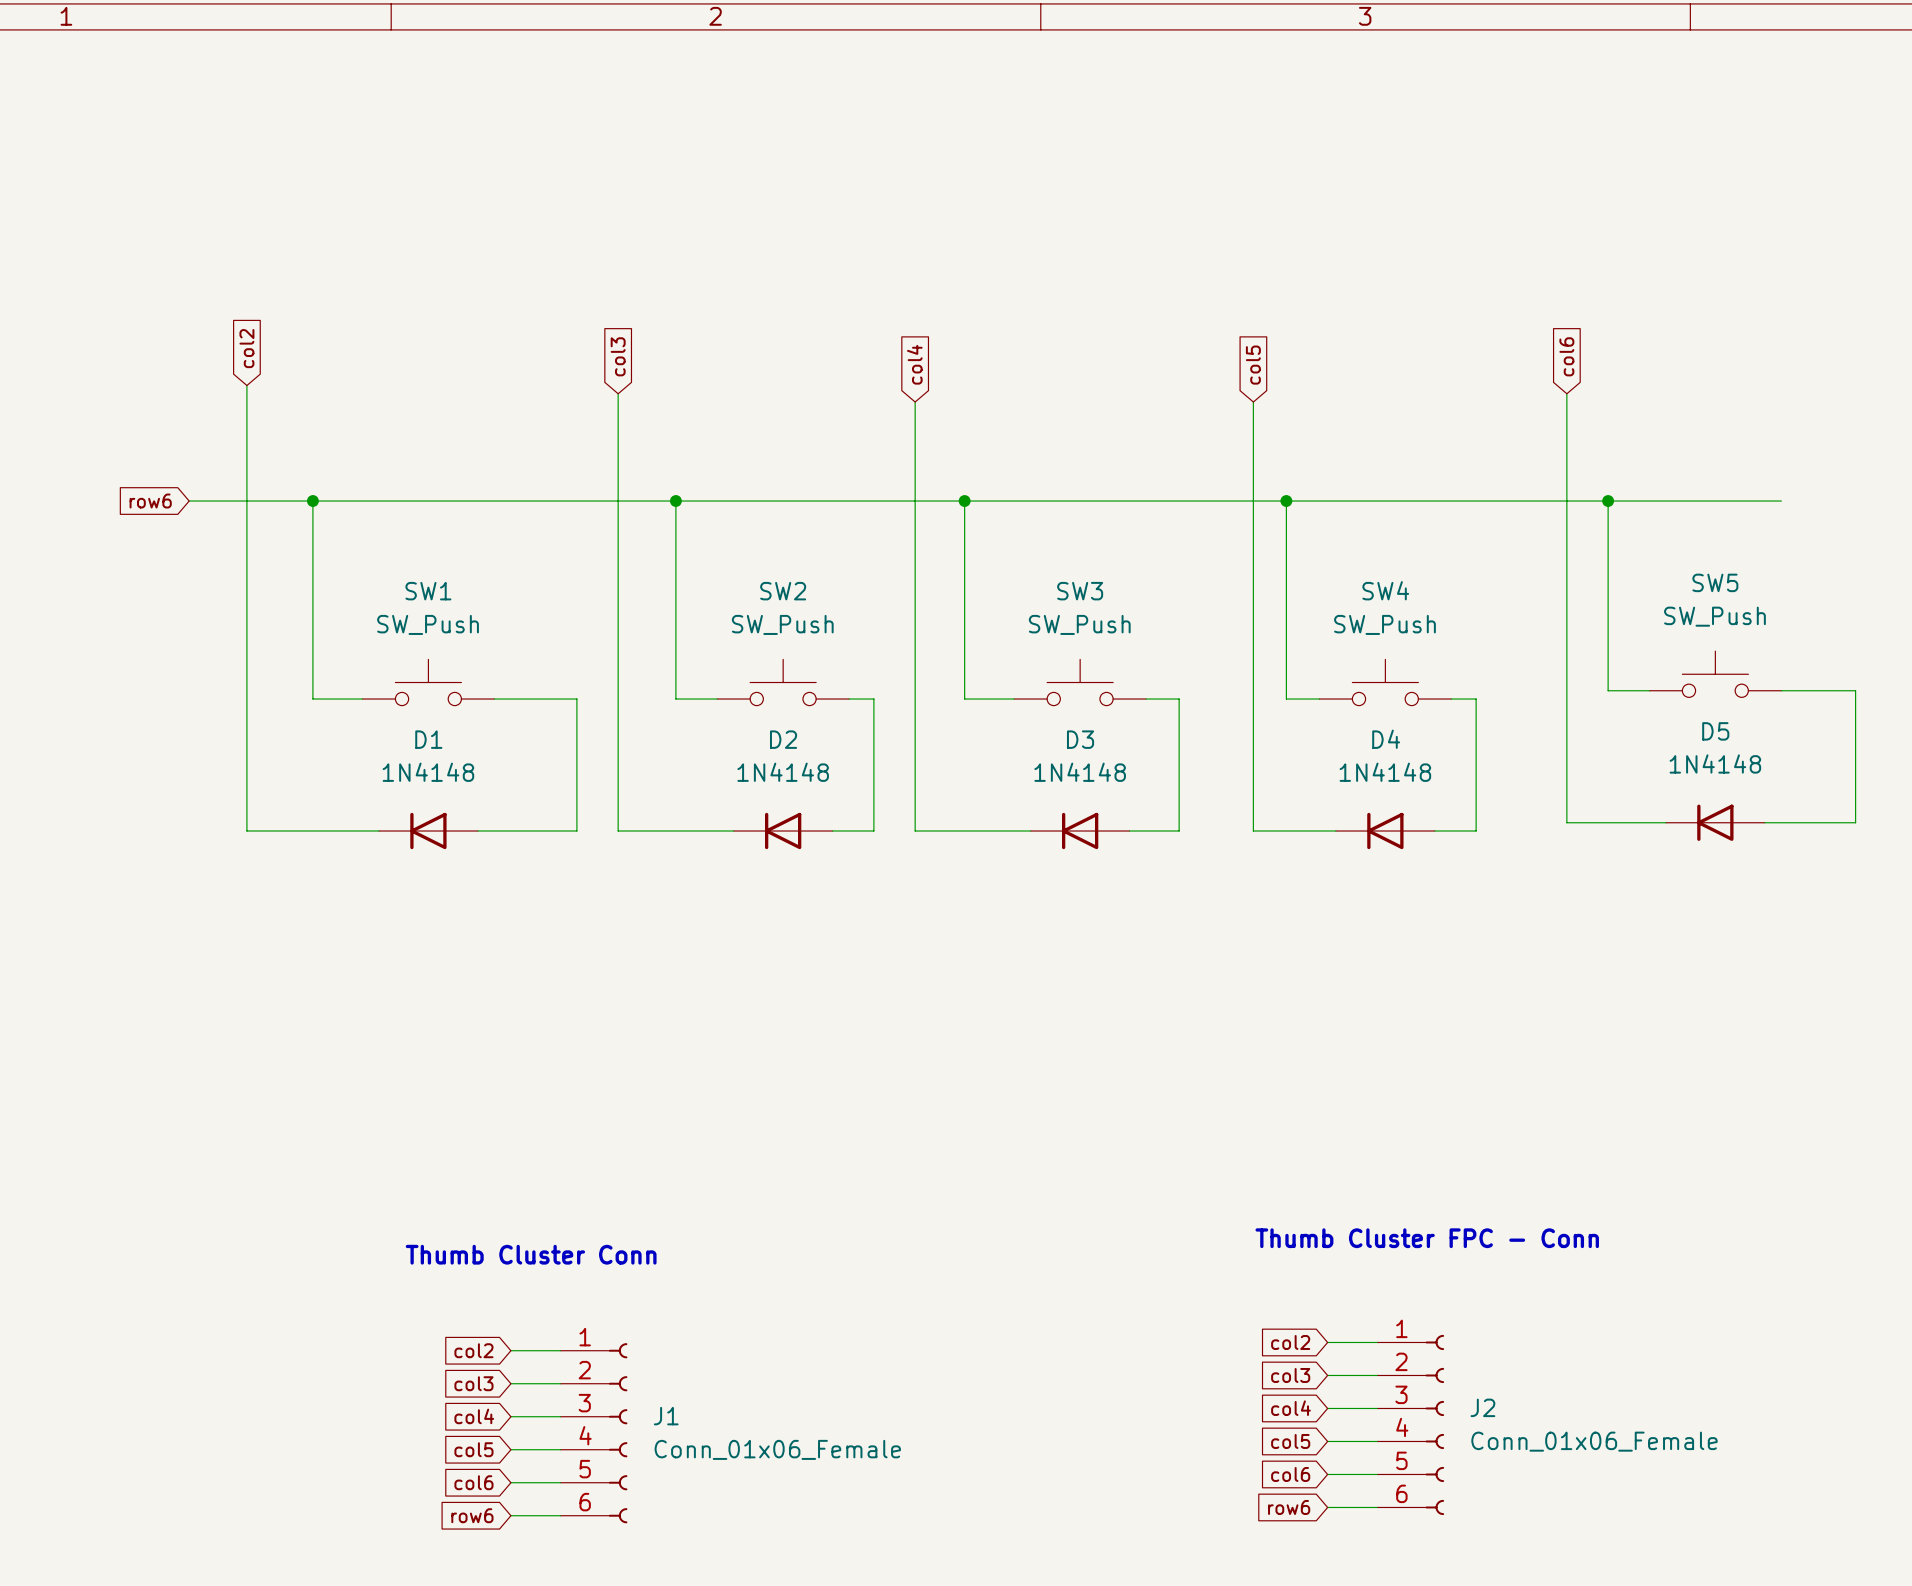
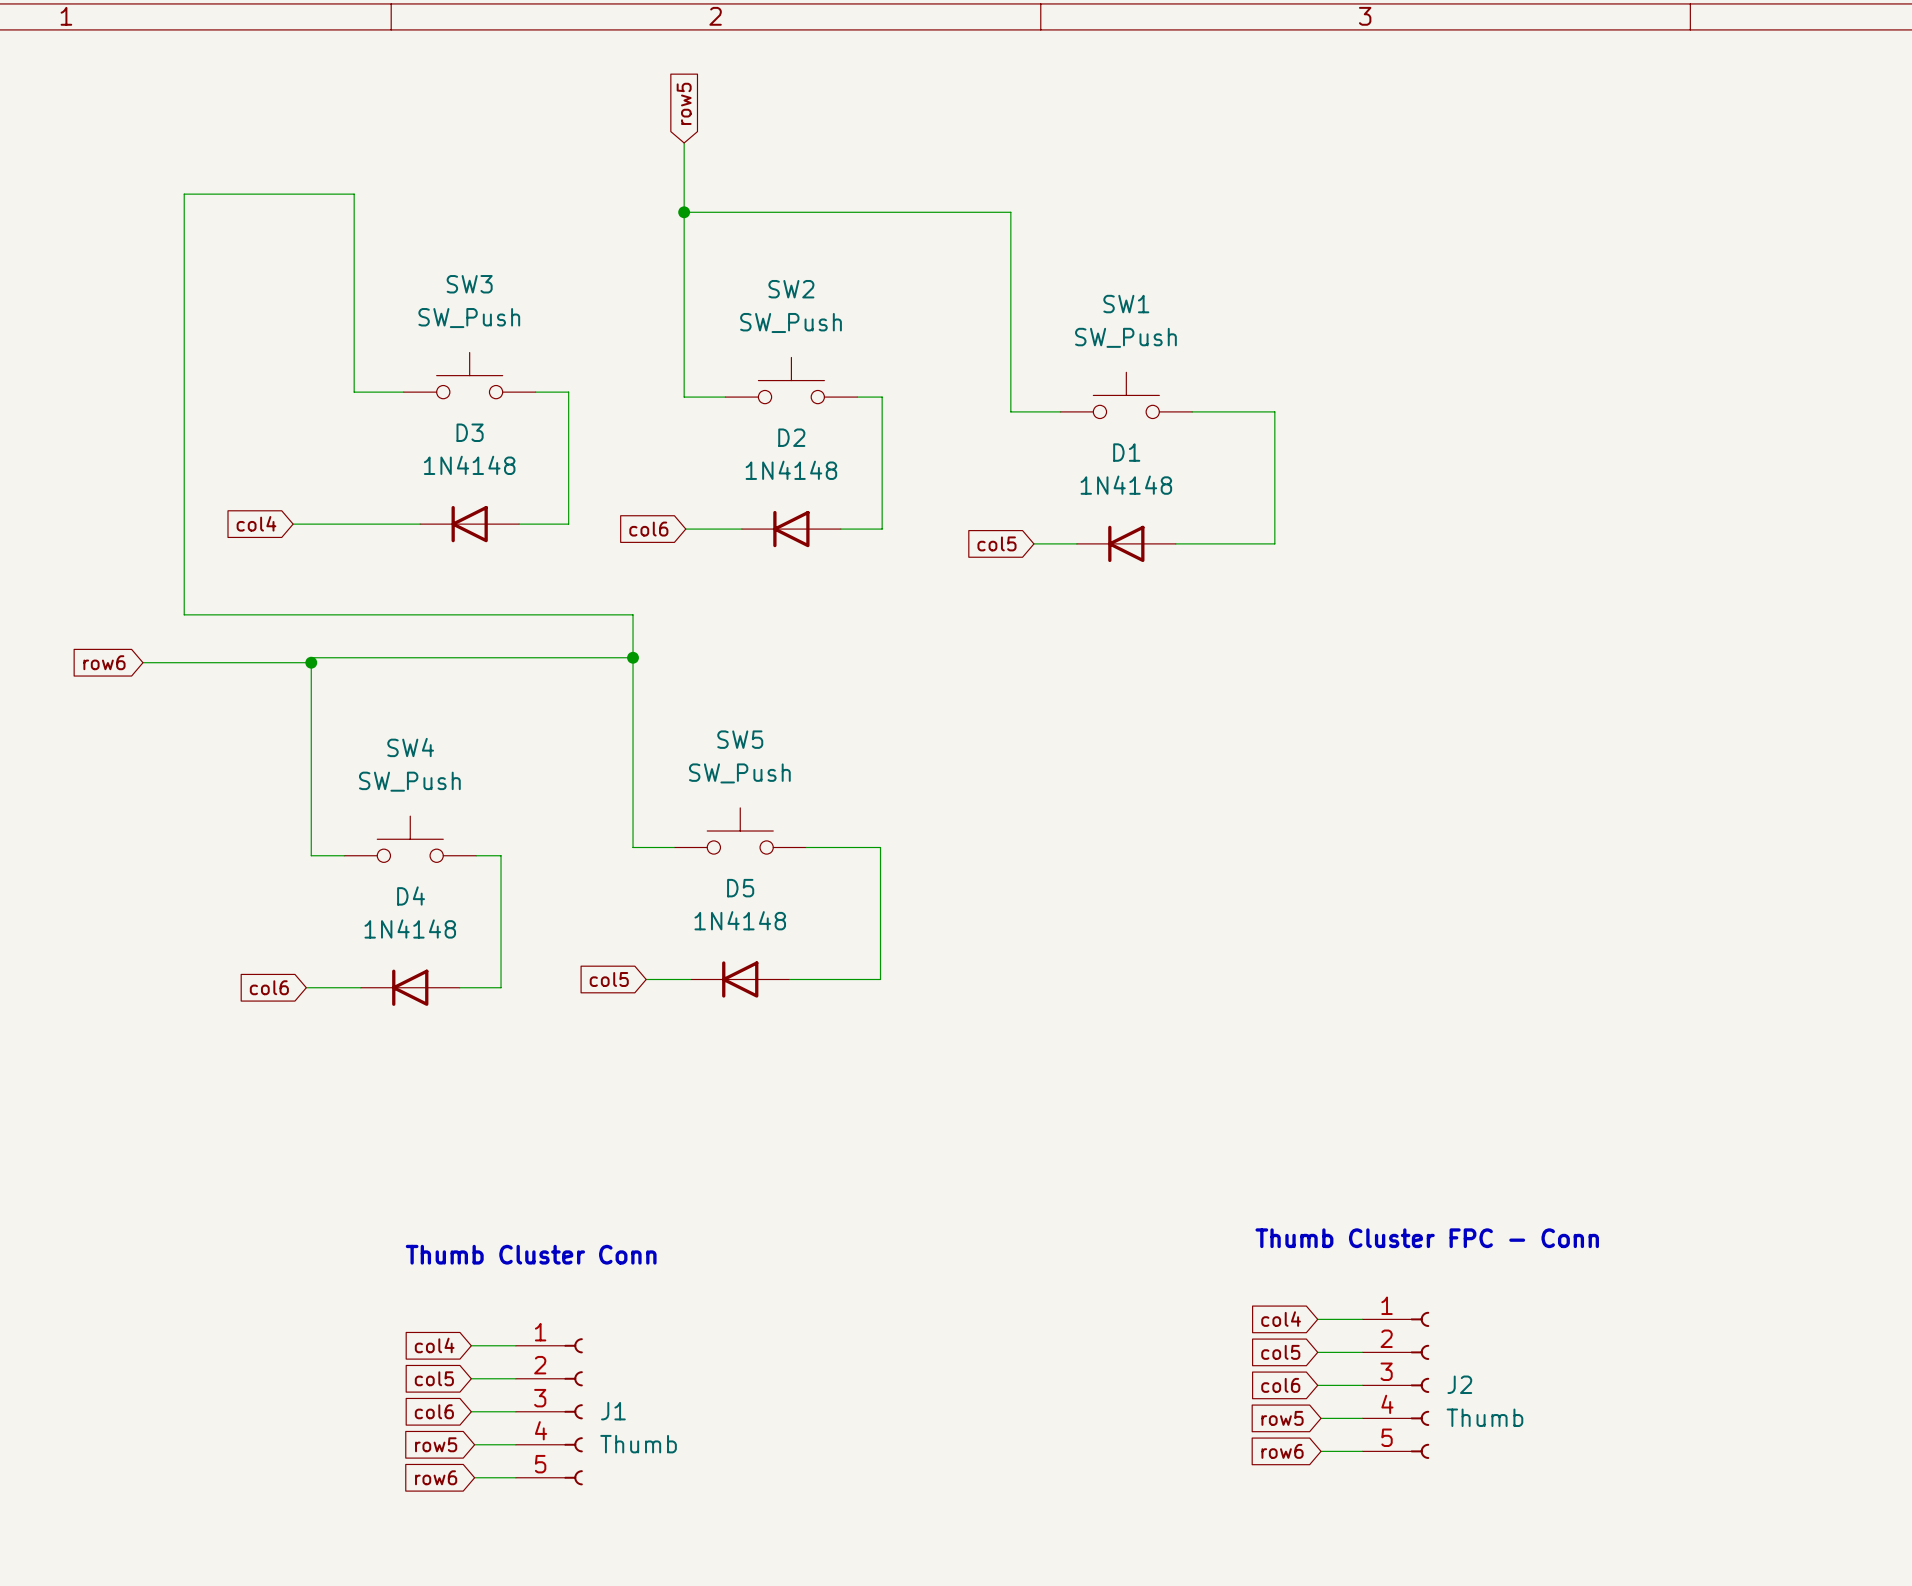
global label: none -> row5 (684, 103)
wire: none -> (684, 142) (684, 397) (725, 397)
wire: none -> (684, 212) (1010, 212) (1010, 411) (1060, 411)
junction: none -> (684, 212)
global label: col2 (246, 348) -> none
global label: col3 (618, 356) -> none
global label: col6 (1566, 356) -> none
global label: col4 (914, 364) -> none
global label rotation: 0° (1253, 365) -> 90° counterclockwise (996, 543)
global label position: col5 (1253, 365) -> col5 (996, 543)
wire: (246, 385) (246, 831) (378, 831) -> none
wire: none -> (403, 392) (354, 392) (354, 194) (184, 194) (184, 614) (633, 614) (633, 847) (674, 847)
wire: none -> (535, 392) (568, 392) (568, 524) (519, 524)
wire: (618, 393) (618, 831) (733, 831) -> none
wire: (1566, 393) (1566, 822) (1665, 822) -> none
wire: (915, 402) (915, 831) (1030, 831) -> none
wire: (1253, 402) (1253, 831) (1335, 831) -> none
wire: none -> (1192, 411) (1274, 411) (1274, 543) (1175, 543)
global label position: row6 (150, 501) -> row6 (104, 662)
wire: (189, 501) (1781, 501) -> none
wire: (312, 501) (312, 699) (362, 699) -> none
junction: (312, 501) -> none
wire: (675, 501) (675, 699) (717, 699) -> none
junction: (675, 501) -> none
wire: (964, 501) (964, 699) (1014, 699) -> none
junction: (964, 501) -> none
wire: (1286, 501) (1286, 699) (1319, 699) -> none
junction: (1286, 501) -> none
wire: (1608, 501) (1608, 690) (1649, 690) -> none
junction: (1608, 501) -> none
global label: none -> col4 (256, 523)
wire: none -> (293, 524) (420, 524)
global label: none -> col6 (648, 529)
wire: none -> (685, 529) (741, 529)
wire: none -> (1033, 543) (1076, 543)
wire: none -> (633, 657) (311, 657) (311, 855) (344, 855)
junction: none -> (633, 657)
wire: none -> (142, 662) (311, 662)
junction: none -> (311, 662)
SW5 position: (1715, 674) -> (740, 831)
SW1 position: (428, 682) -> (1126, 395)
SW2 position: (783, 682) -> (791, 380)
SW3 position: (1080, 682) -> (469, 375)
SW4 position: (1385, 682) -> (410, 839)
wire: (1781, 690) (1855, 690) (1855, 822) (1764, 822) -> none
wire: (494, 699) (576, 699) (576, 831) (477, 831) -> none
wire: (849, 699) (873, 699) (873, 831) (832, 831) -> (857, 397) (882, 397) (882, 529) (840, 529)
wire: (1146, 699) (1179, 699) (1179, 831) (1129, 831) -> none
wire: (1451, 699) (1476, 699) (1476, 831) (1434, 831) -> none
D5 position: (1715, 822) -> (740, 979)
D1 position: (428, 831) -> (1126, 543)
D2 position: (783, 831) -> (791, 529)
D3 position: (1080, 831) -> (469, 524)
D4 position: (1385, 831) -> (410, 987)
wire: none -> (806, 847) (880, 847) (880, 979) (789, 979)
wire: none -> (476, 855) (501, 855) (501, 987) (459, 987)
global label: none -> col5 (609, 979)
wire: none -> (646, 979) (690, 979)
global label: none -> col6 (269, 987)
wire: none -> (306, 987) (360, 987)
wire: none -> (1317, 1319) (1362, 1319)
J2 symbol: [1377, 1334, 1445, 1516] -> [1362, 1311, 1430, 1459]
global label: col2 (1290, 1342) -> none
wire: (1327, 1342) (1377, 1342) -> none
J1 symbol: [560, 1343, 628, 1524] -> [515, 1338, 583, 1486]
wire: none -> (471, 1345) (515, 1345)
global label: col2 (473, 1350) -> none
wire: (510, 1350) (560, 1350) -> none
wire: none -> (1317, 1352) (1362, 1352)
global label: col3 (1290, 1375) -> none
wire: (1327, 1375) (1377, 1375) -> none
wire: none -> (471, 1378) (515, 1378)
global label: col3 (473, 1383) -> none
wire: (510, 1383) (560, 1383) -> none
wire: none -> (1317, 1385) (1362, 1385)
global label position: col4 (1290, 1408) -> col4 (1281, 1319)
wire: (1327, 1408) (1377, 1408) -> none
wire: none -> (471, 1411) (515, 1411)
global label position: col4 (474, 1416) -> col4 (434, 1345)
wire: (510, 1416) (560, 1416) -> none
global label: none -> row5 (1282, 1418)
wire: none -> (1321, 1418) (1362, 1418)
global label position: col5 (1290, 1441) -> col5 (1280, 1352)
wire: (1327, 1441) (1377, 1441) -> none
J2 value: Conn_01x06_Female (1594, 1441) -> Thumb (1484, 1417)
global label: none -> row5 (436, 1444)
wire: none -> (474, 1444) (515, 1444)
global label position: col5 (473, 1449) -> col5 (434, 1378)
wire: (510, 1449) (560, 1449) -> none
J1 value: Conn_01x06_Female (777, 1449) -> Thumb (638, 1444)
wire: none -> (1321, 1451) (1362, 1451)
global label position: col6 (1290, 1474) -> col6 (1280, 1385)
wire: (1327, 1474) (1377, 1474) -> none
wire: none -> (474, 1477) (515, 1477)
global label position: col6 (473, 1482) -> col6 (434, 1411)
wire: (510, 1482) (560, 1482) -> none
global label position: row6 (1289, 1507) -> row6 (1282, 1451)
wire: (1327, 1507) (1377, 1507) -> none
global label position: row6 (472, 1515) -> row6 (436, 1477)
wire: (510, 1515) (560, 1515) -> none

